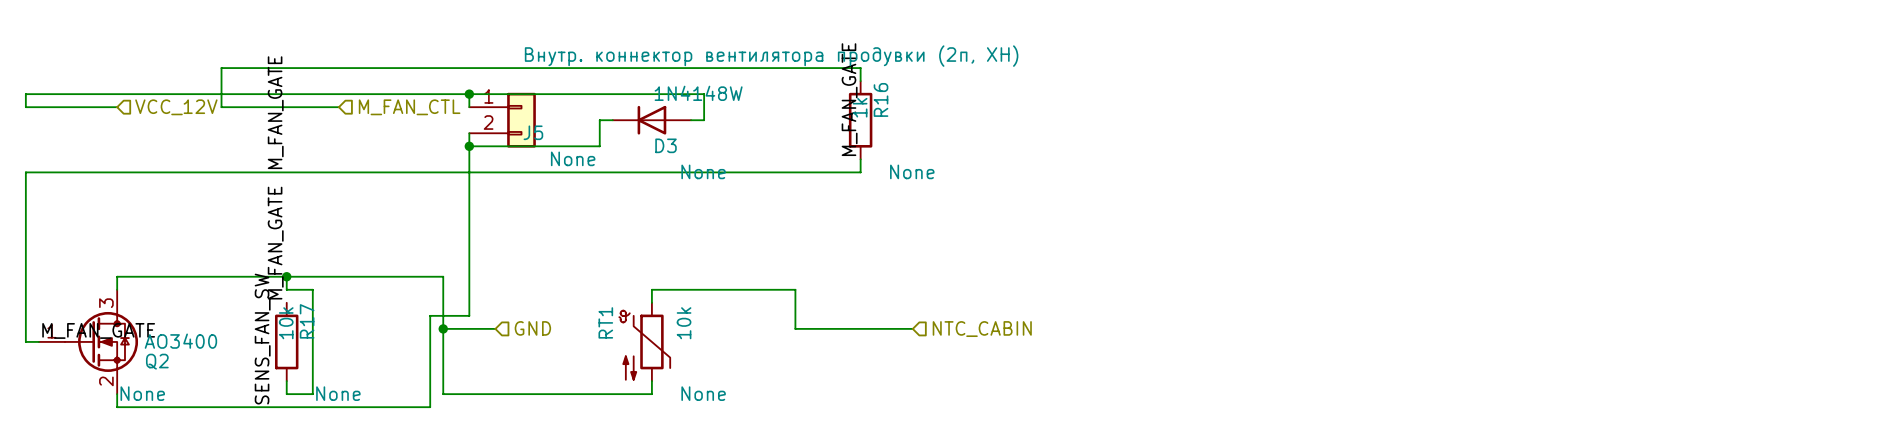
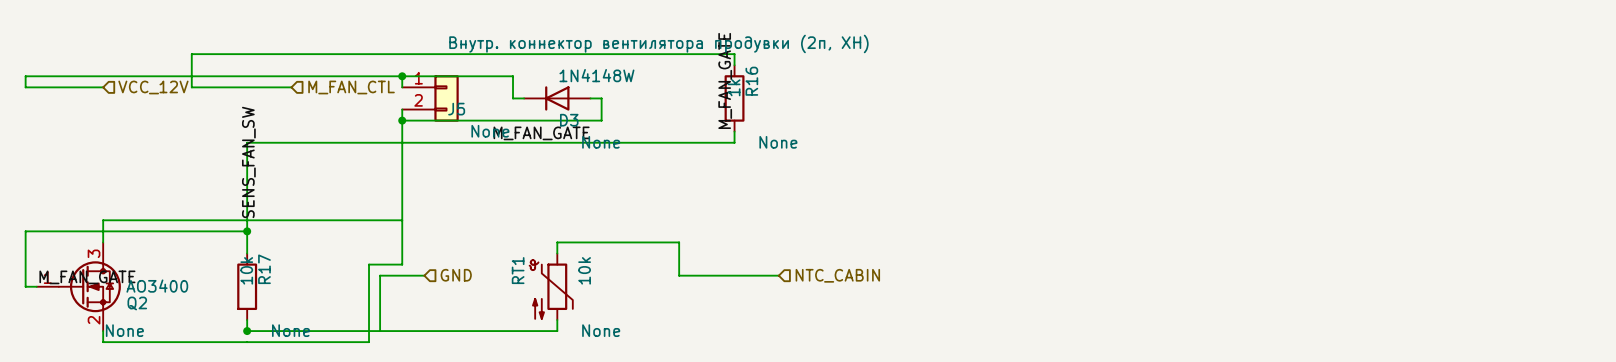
wire: (599, 94) (704, 94) (704, 120) -> (513, 120) (601, 120) (601, 98)
label: M_FAN_GATE (275, 112) -> none
wire: (599, 120) (599, 146) -> (513, 98) (513, 76)
label: none -> M_FAN_GATE (541, 133)
wire: (286, 172) (25, 172) (25, 276) -> (402, 220) (103, 220) (103, 231) (25, 231)
label: M_FAN_GATE (275, 243) -> none
wire: (286, 276) (443, 276) (443, 328) -> (247, 231) (247, 142)
wire: (286, 289) (312, 289) (312, 394) -> (247, 242) (247, 253)
junction: (443, 328) -> none
label position: SENS_FAN_SW (262, 339) -> SENS_FAN_SW (248, 162)
junction: none -> (247, 331)
wire: none -> (269, 331) (380, 331)

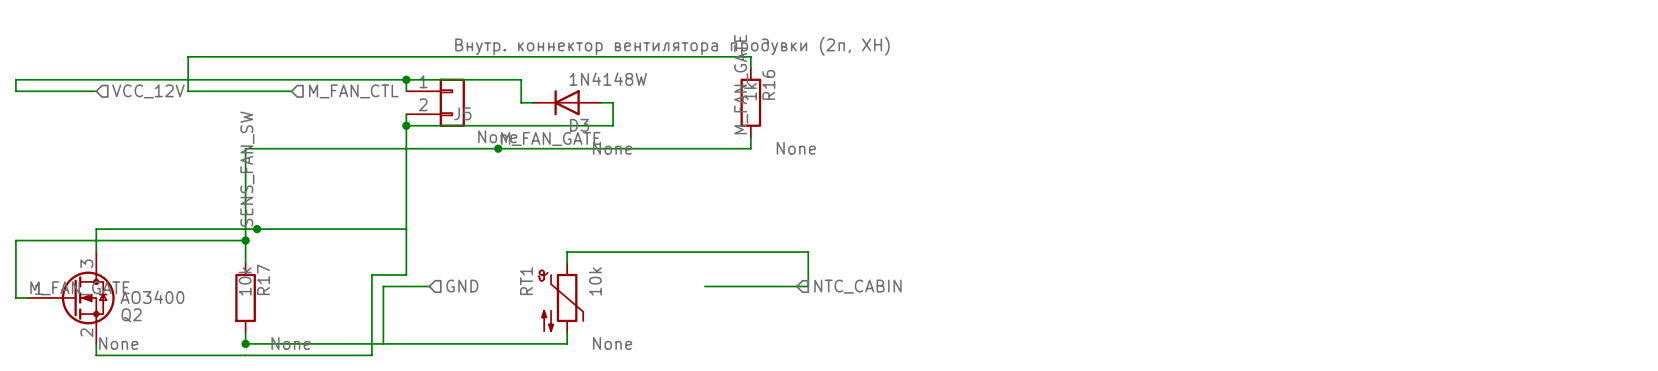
junction: none -> (498, 148)
junction: none -> (257, 229)
wire: (679, 242) (679, 275) (690, 275) -> (693, 252) (808, 252) (808, 286) (796, 286)

